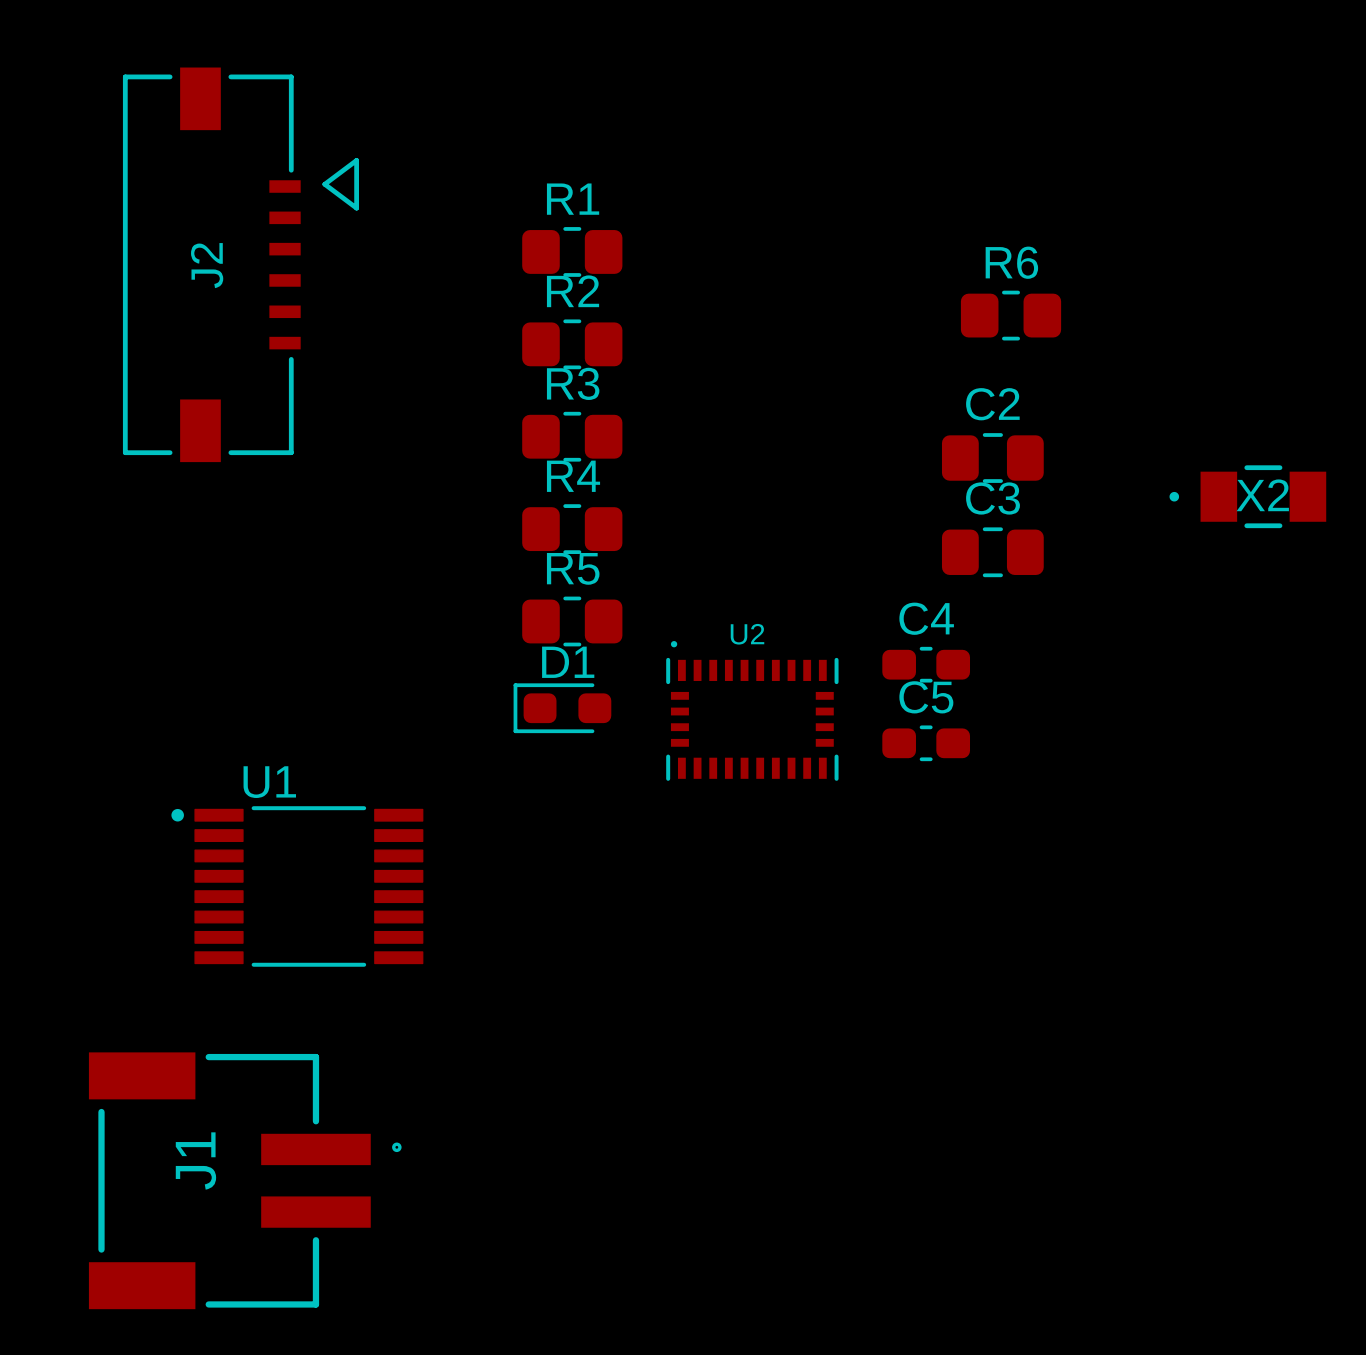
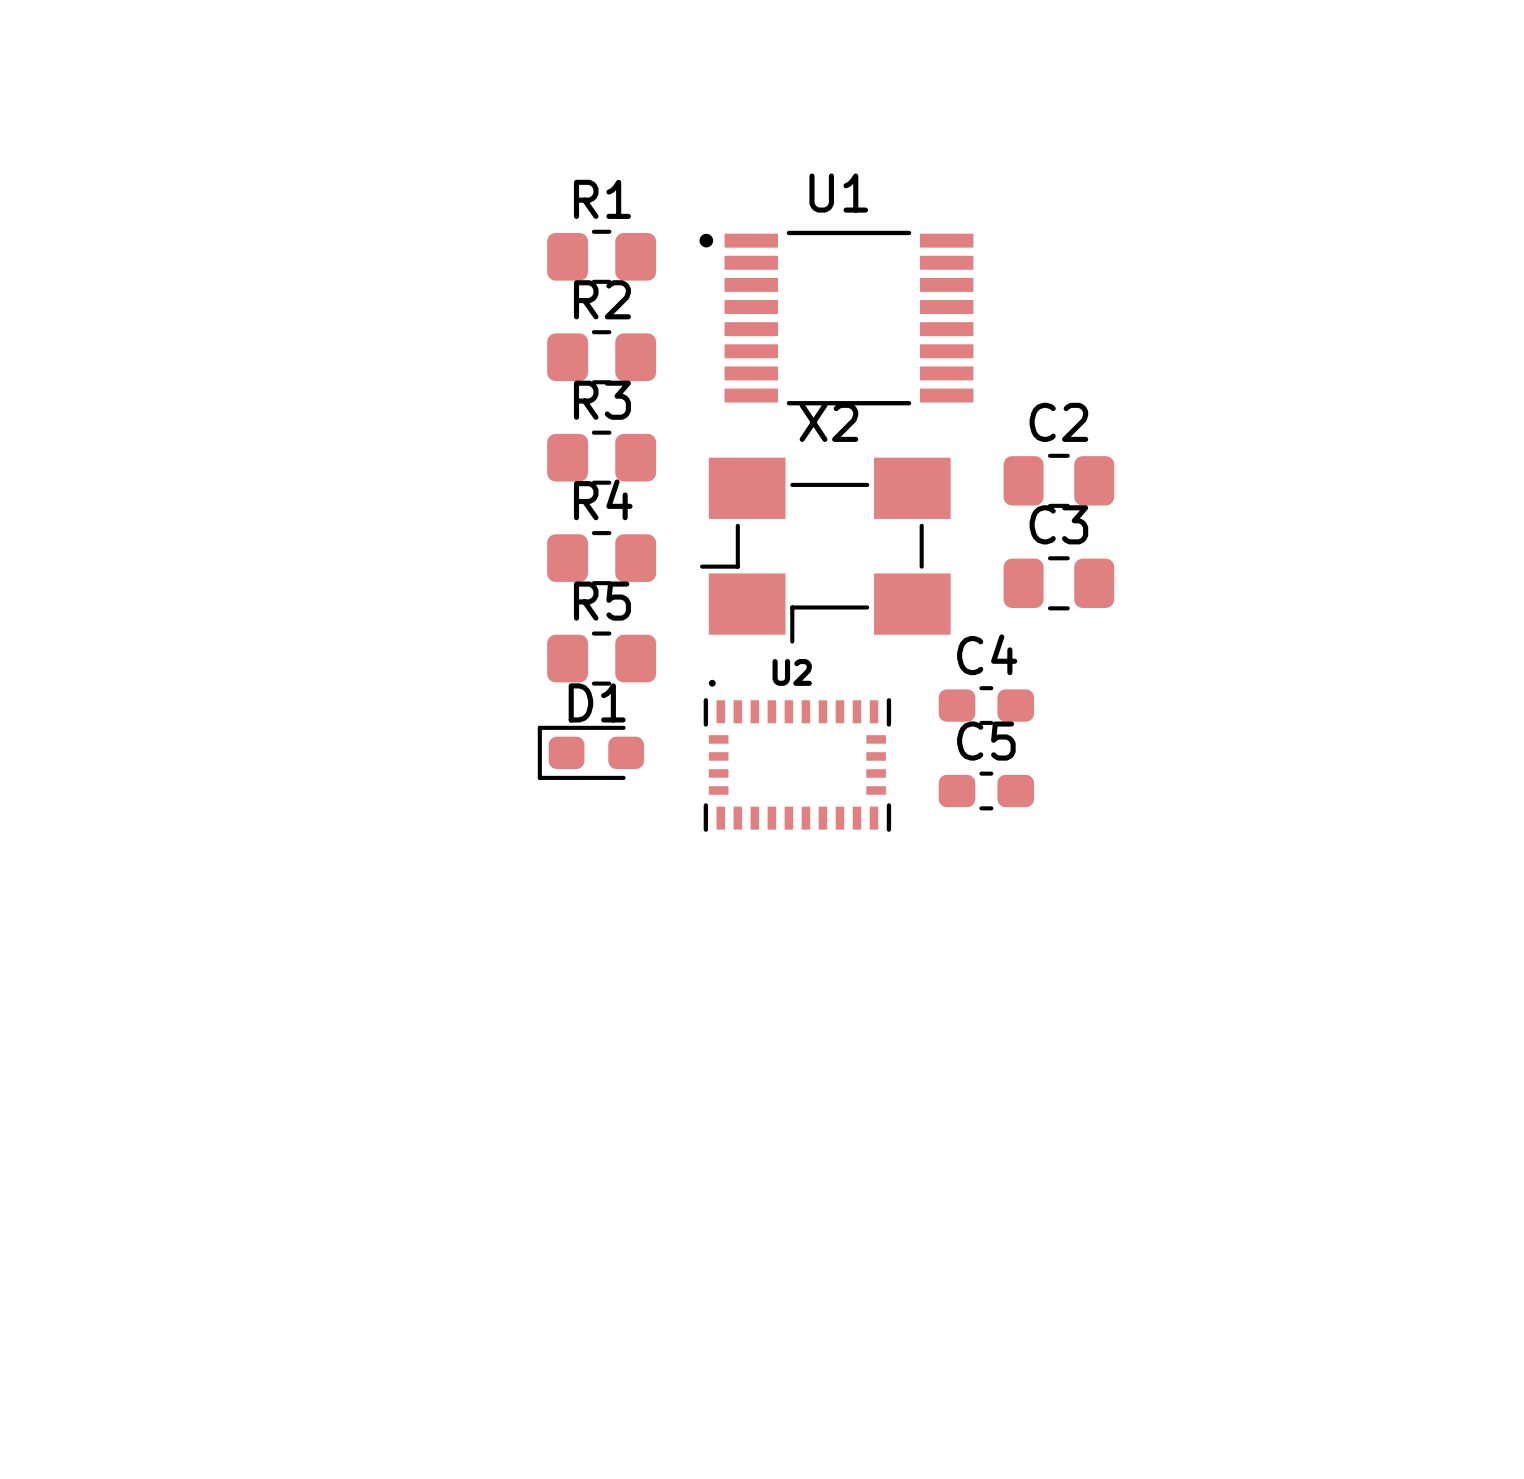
J2: (240, 264) -> none
R6: (1011, 315) -> none
X2 footprint: [1169, 465, 1327, 529] -> [700, 457, 951, 644]
X2 name position: X2 (1262, 495) -> X2 (828, 422)
U1 name position: U1 (269, 782) -> U1 (838, 193)
U1 position: (297, 886) -> (836, 318)
J1: (245, 1180) -> none

